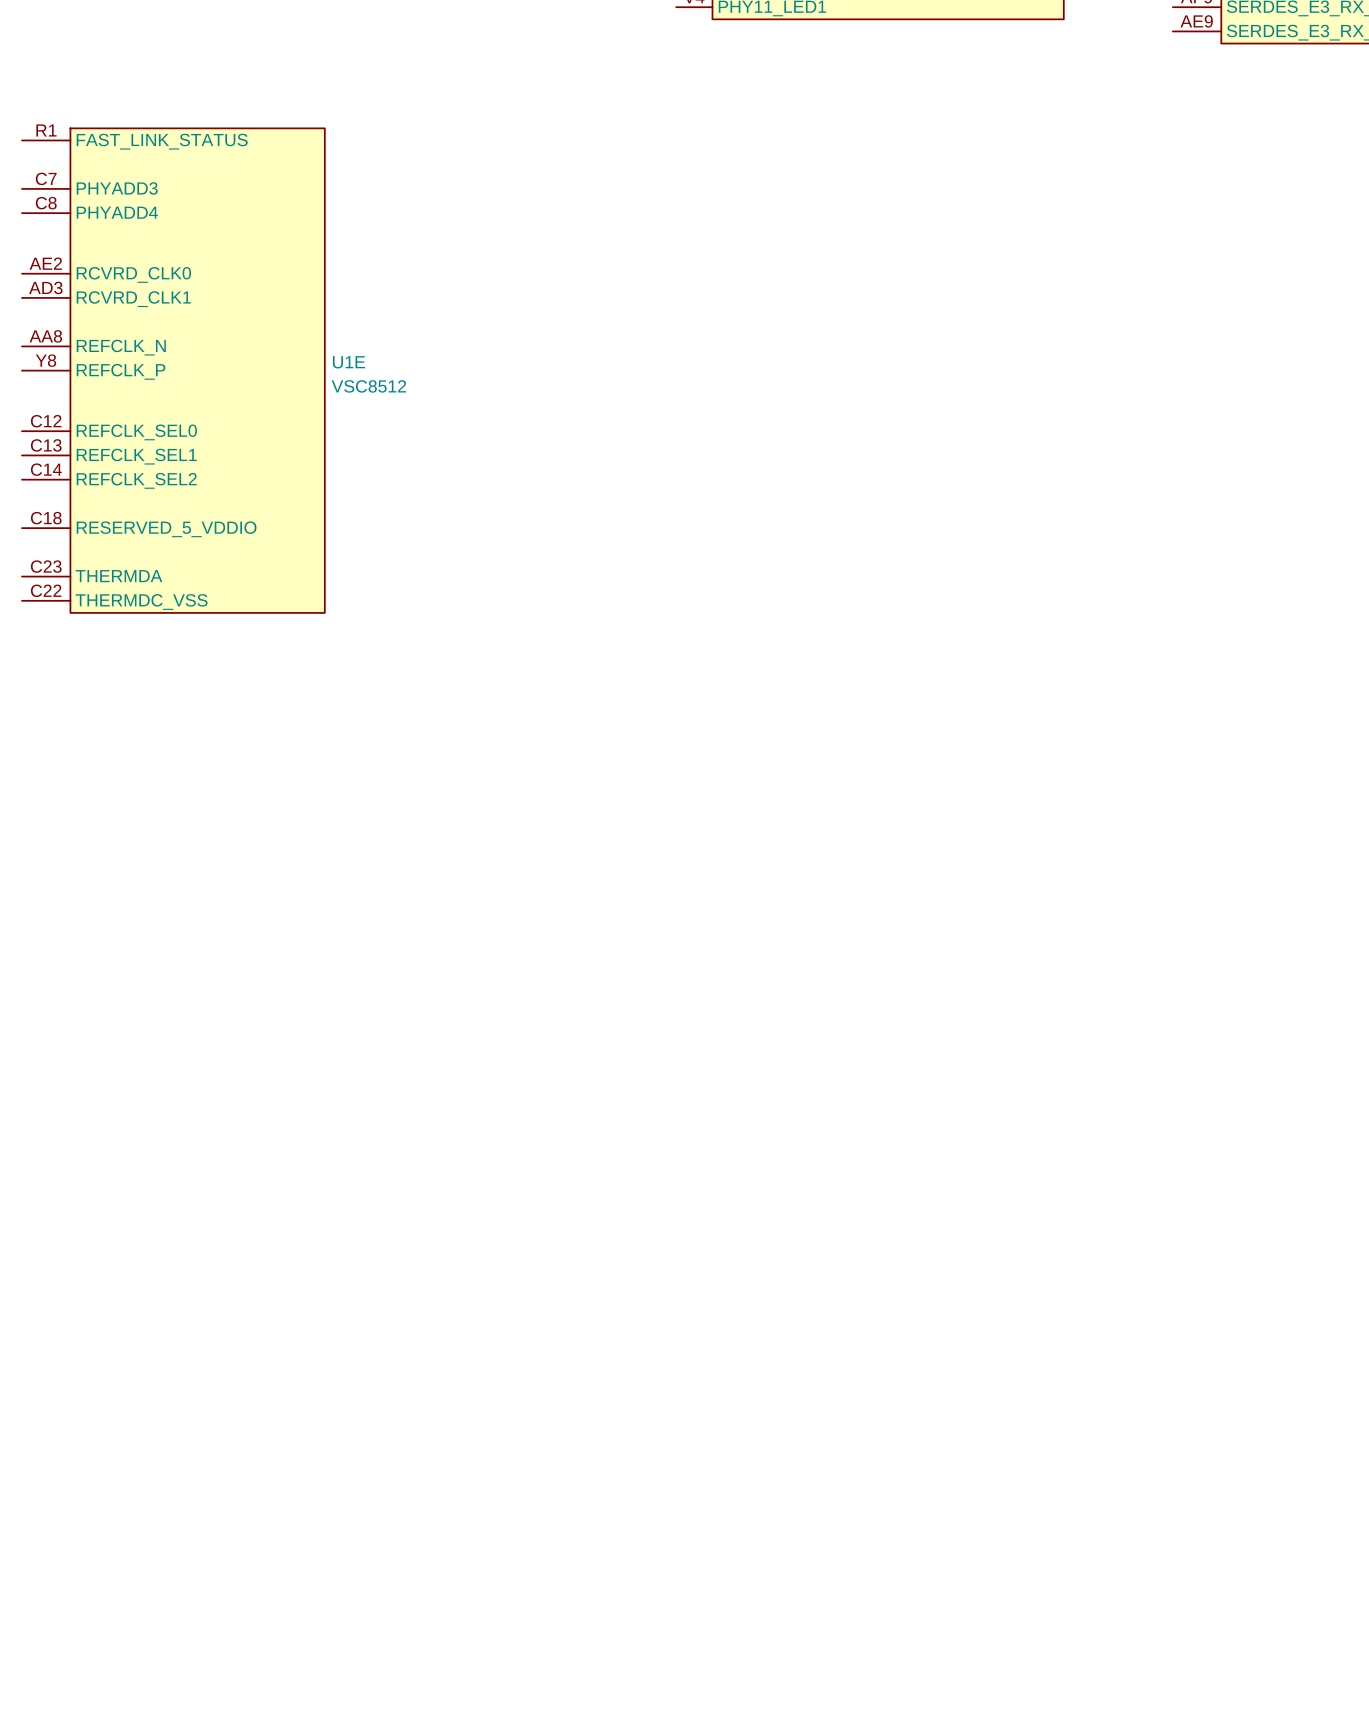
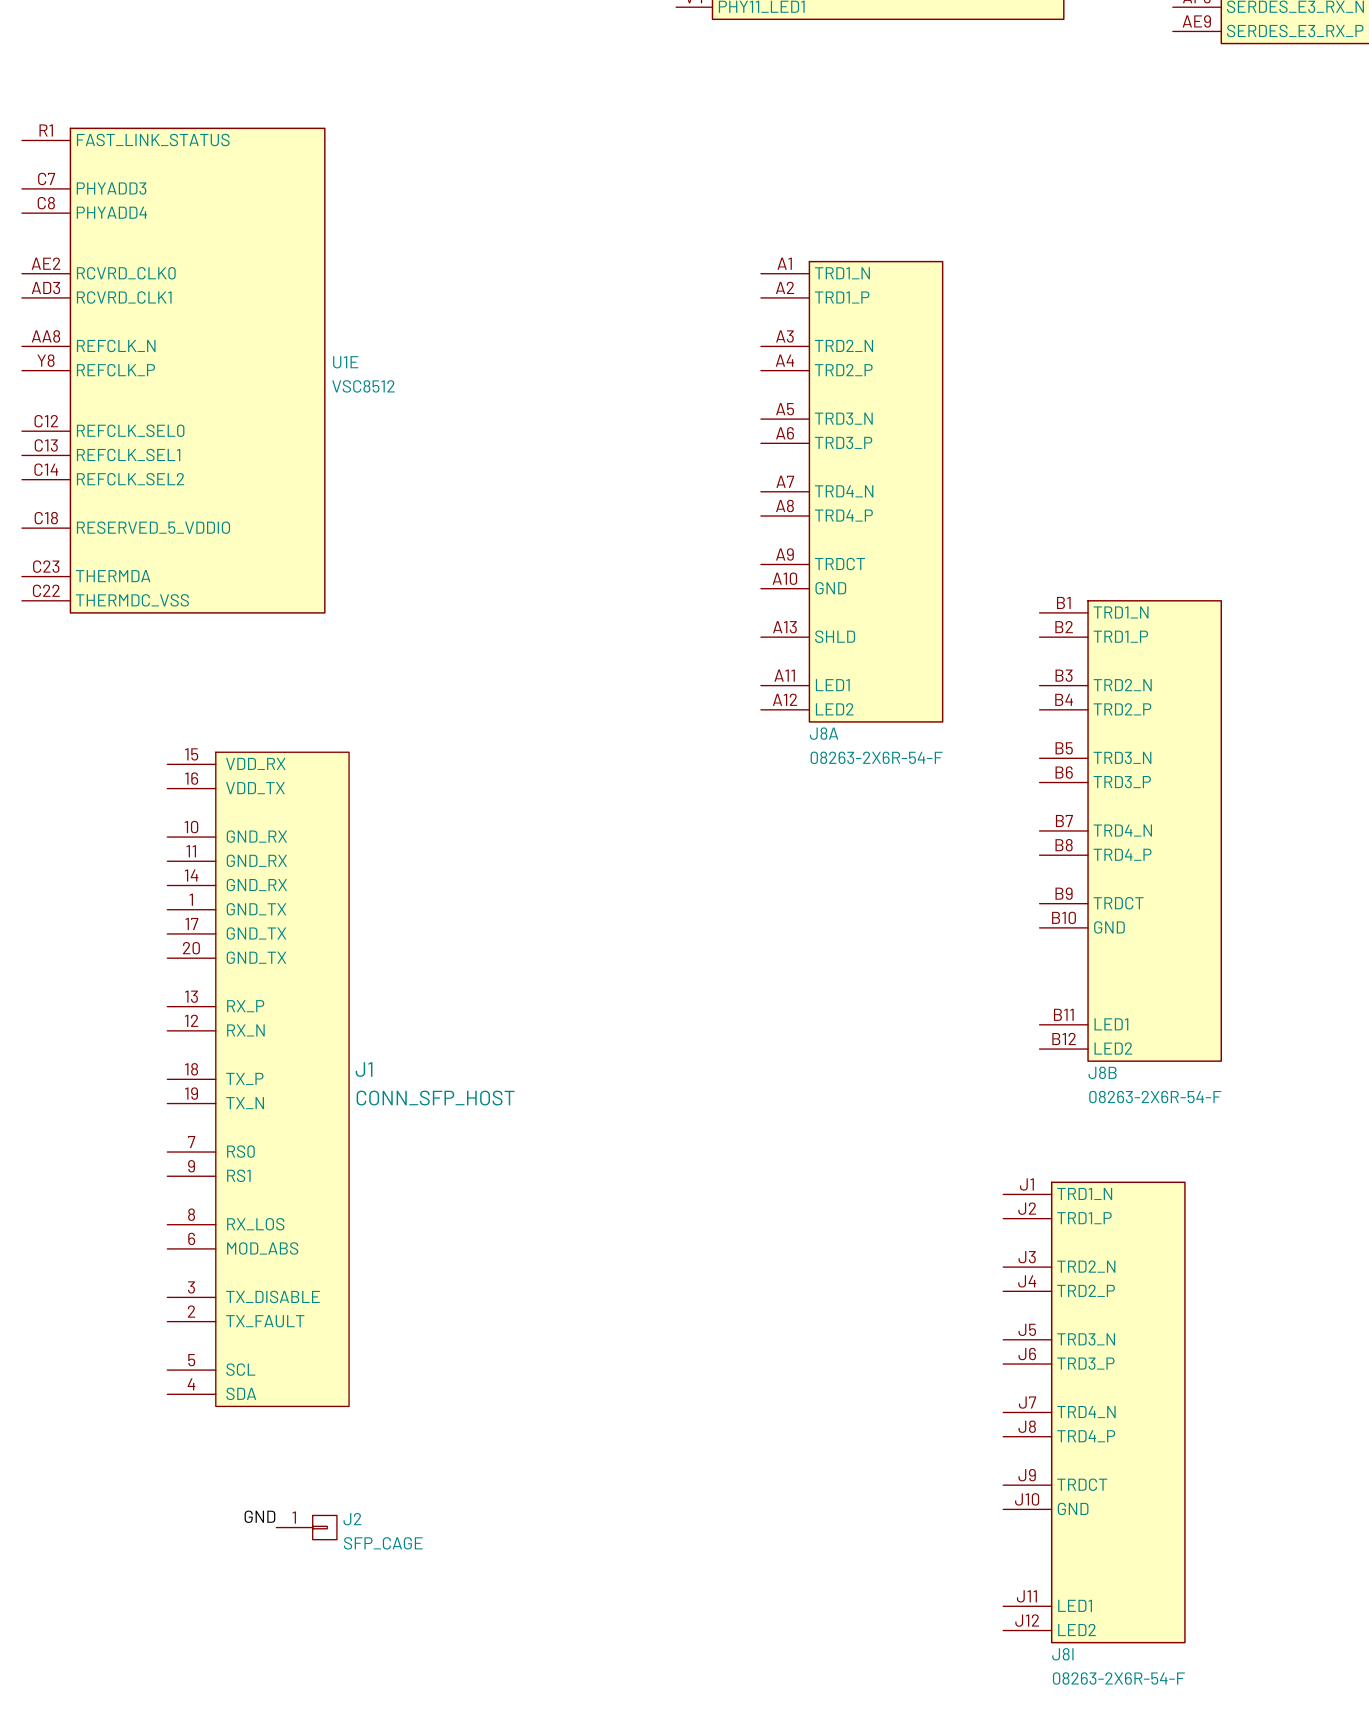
J8A: none -> 08263-2X6R-54-F (852, 491)
J8B: none -> 08263-2X6R-54-F (1130, 830)
J1: none -> CONN_SFP_HOST (258, 1079)
J8I: none -> 08263-2X6R-54-F (1094, 1412)
label: none -> GND (259, 1516)
J2: none -> SFP_CAGE (306, 1527)

